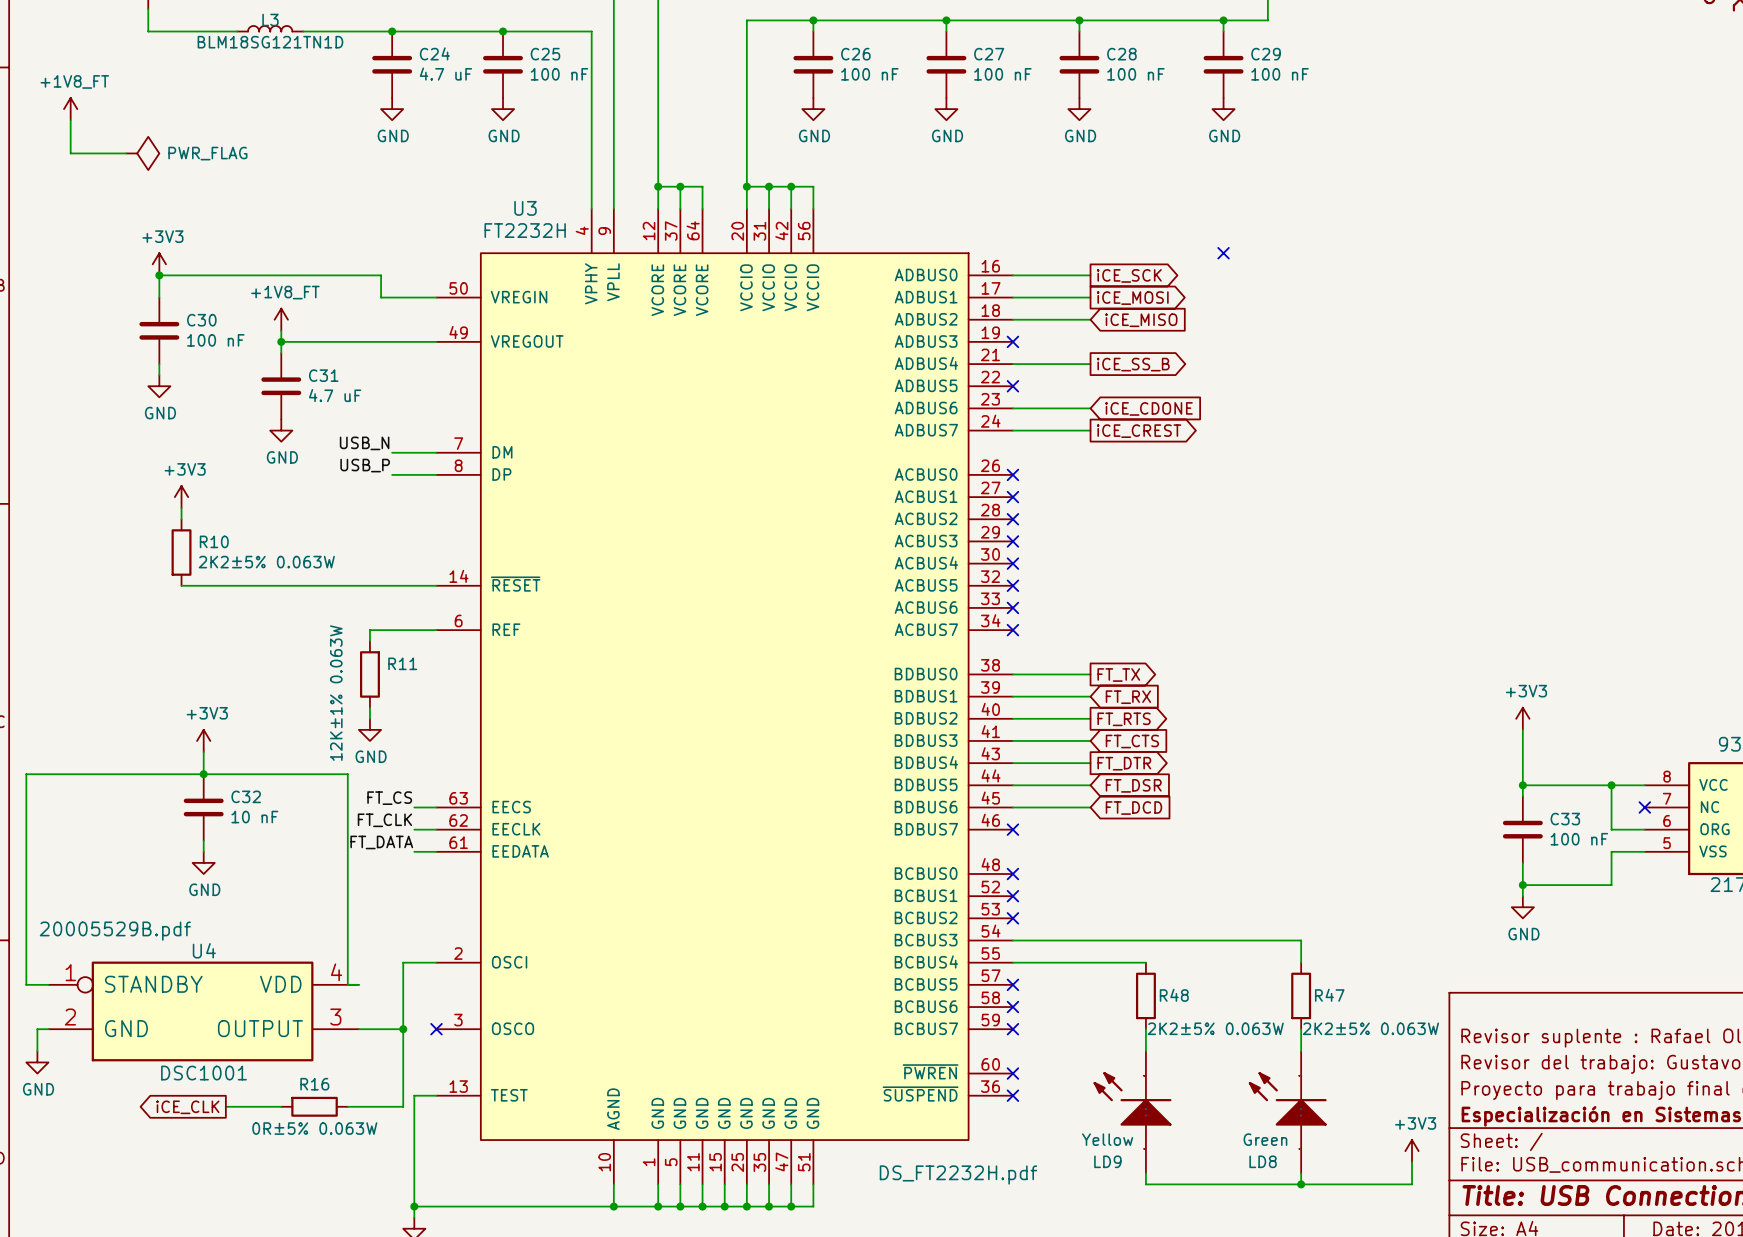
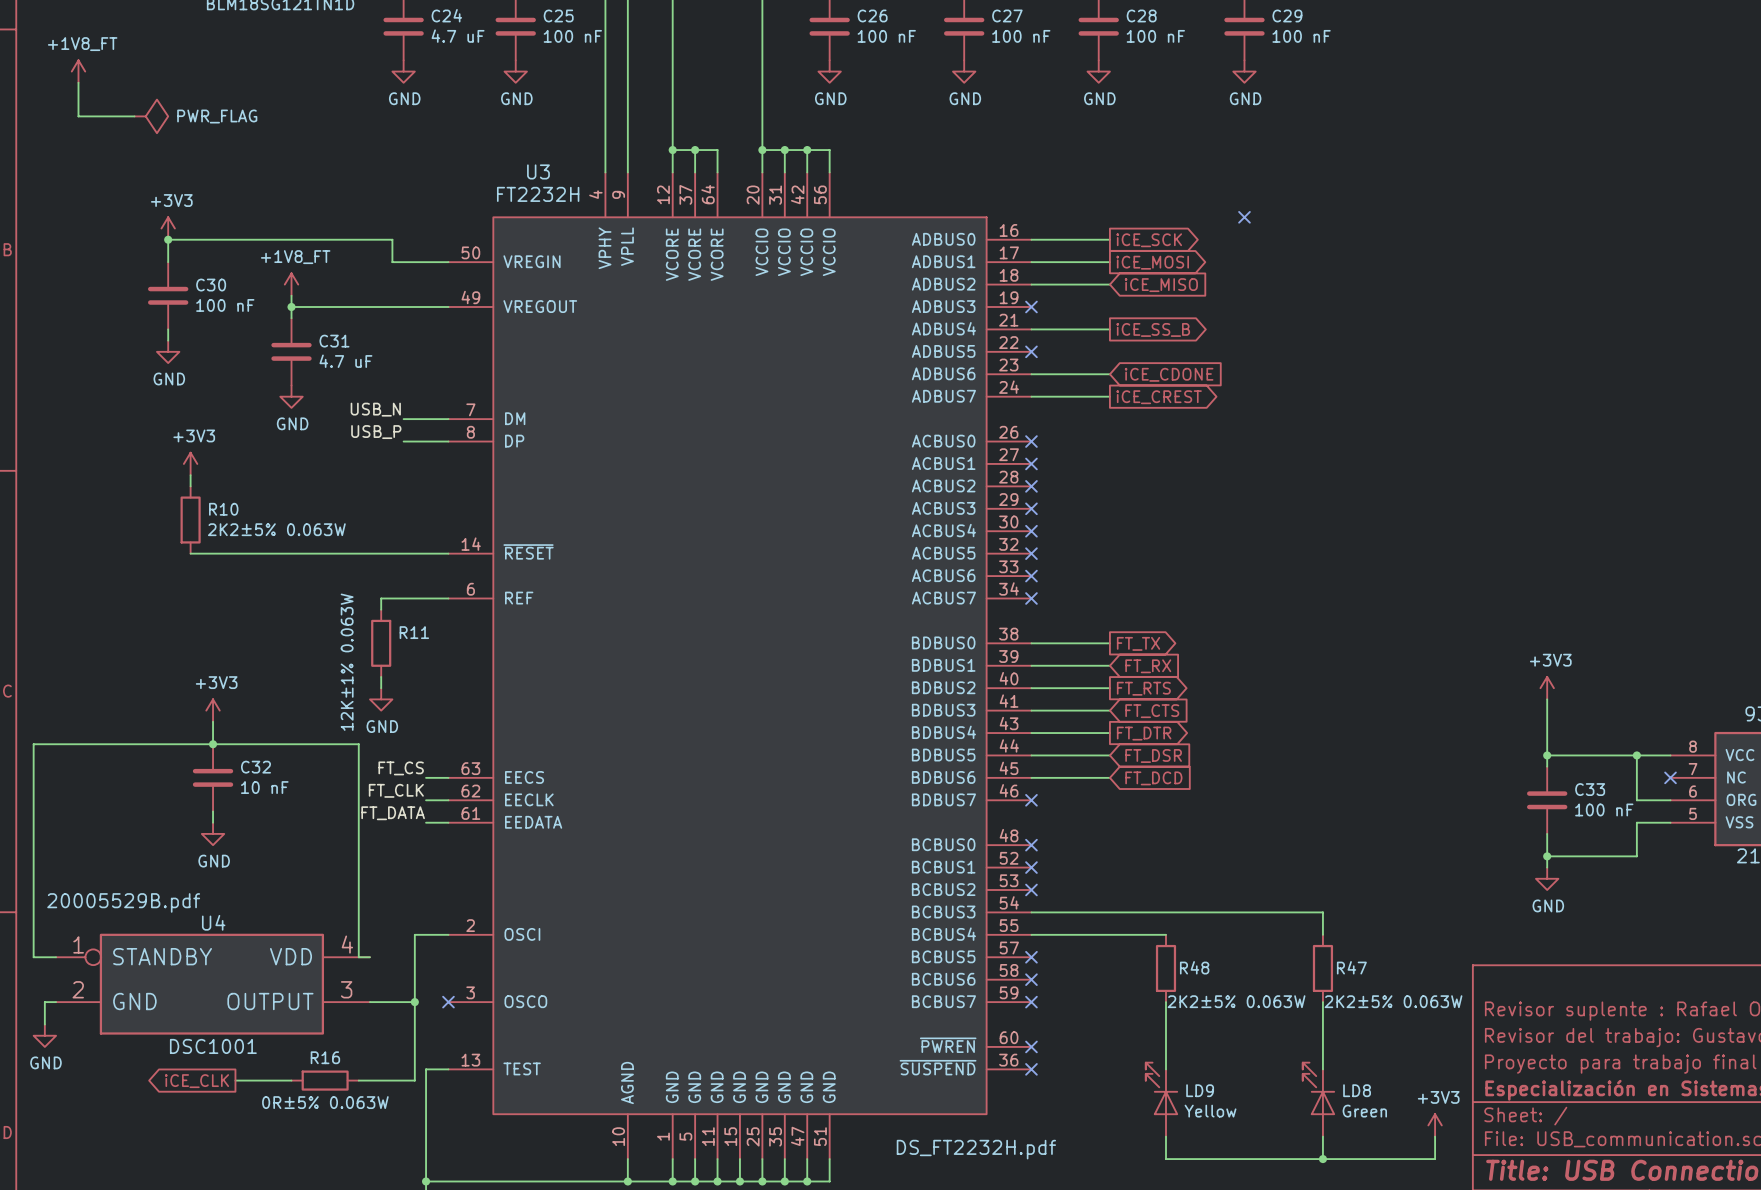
LD9 symbol: [1093, 1051, 1172, 1174] -> [1145, 1062, 1179, 1137]
LD8 symbol: [1248, 1051, 1327, 1174] -> [1302, 1062, 1336, 1137]
LD9 value position: Yellow (1107, 1139) -> Yellow (1210, 1111)
LD8 value position: Green (1265, 1139) -> Green (1364, 1111)
LD9 name position: LD9 (1107, 1161) -> LD9 (1200, 1090)
LD8 name position: LD8 (1263, 1161) -> LD8 (1357, 1090)

